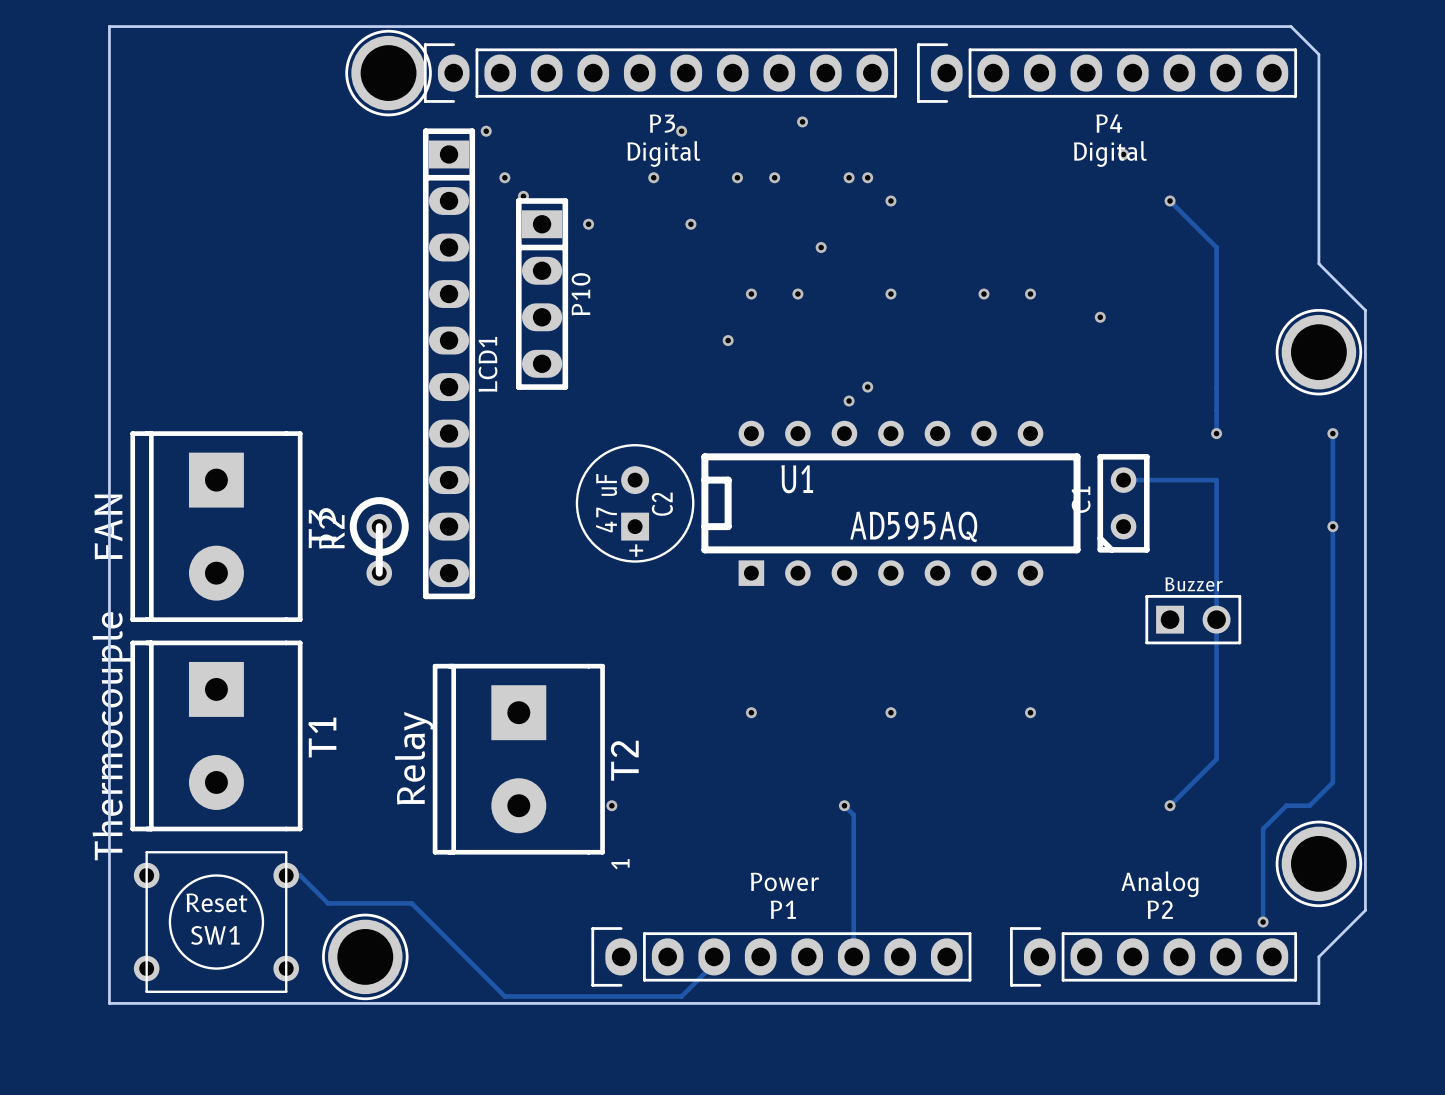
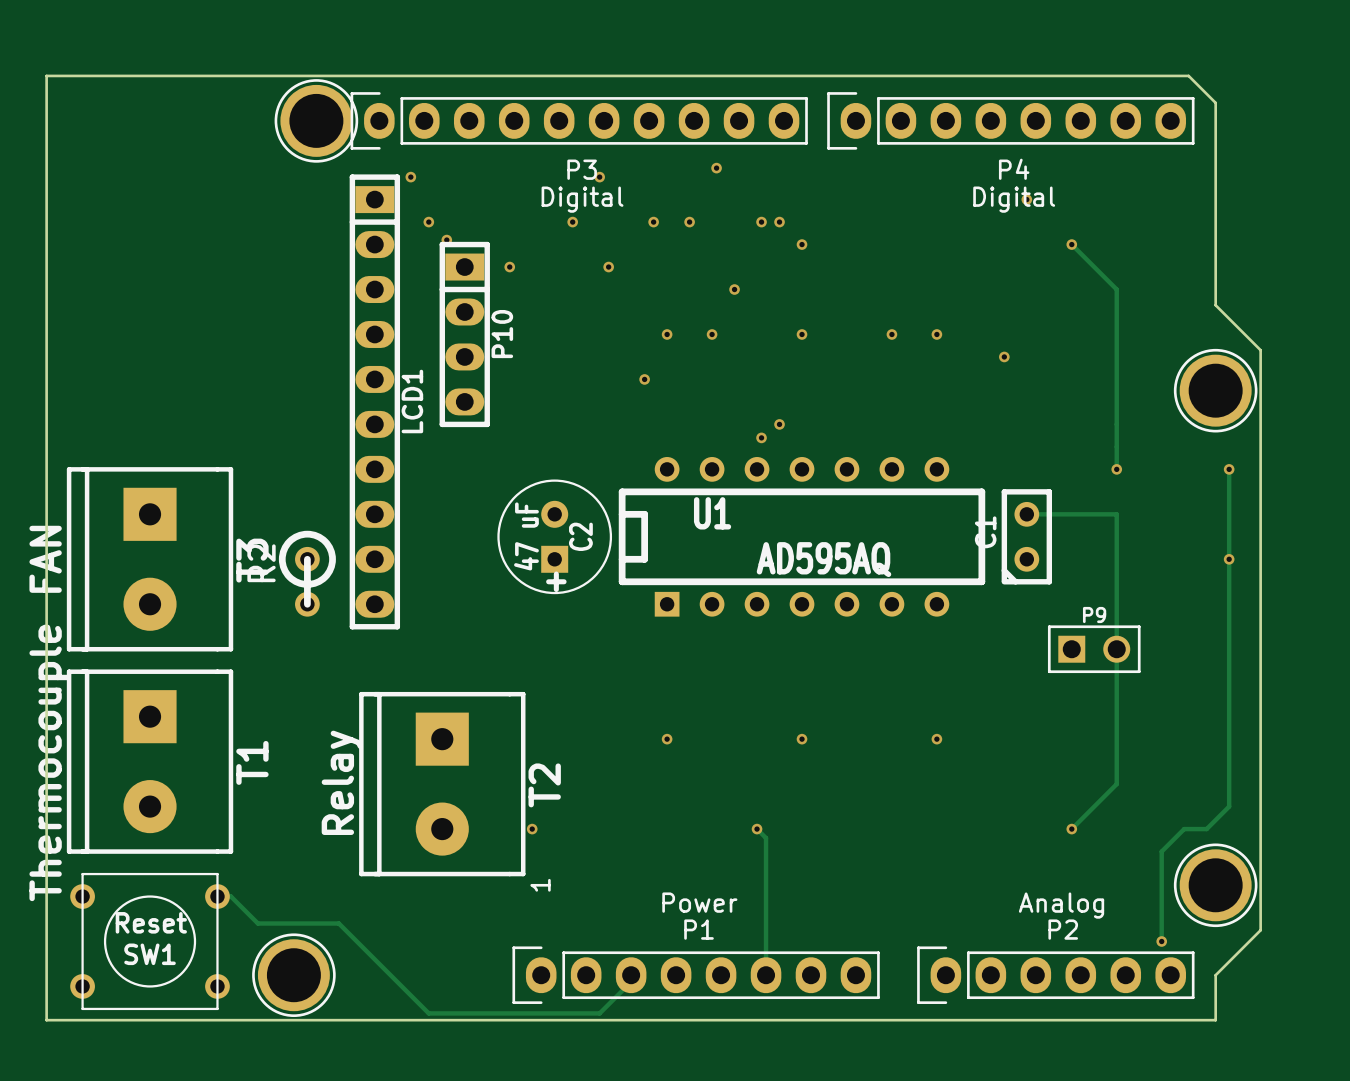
P9 name: none -> P9 (1094, 615)
P9 value: Buzzer (1194, 584) -> none

